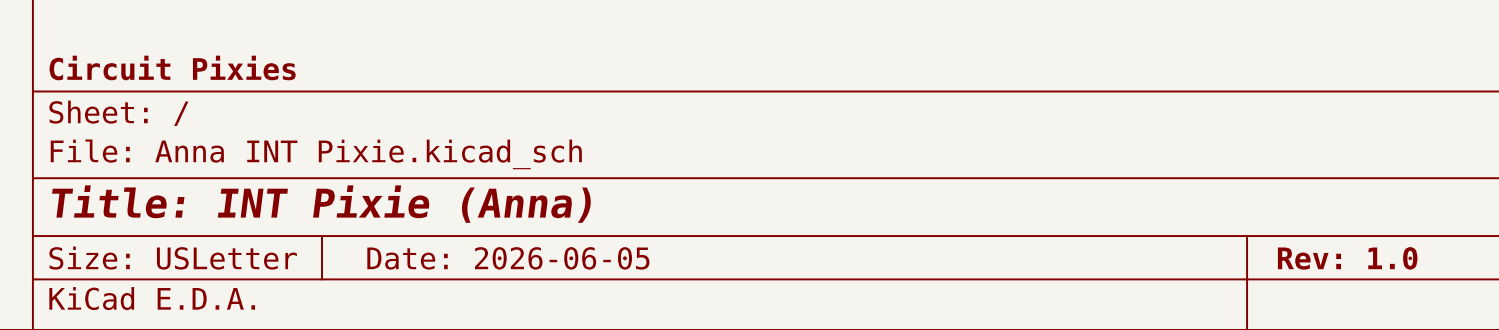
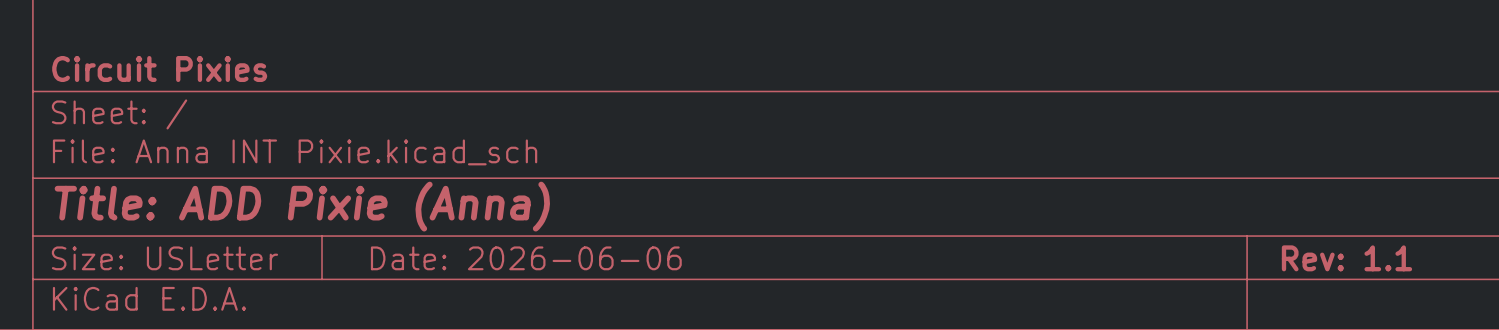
title block: Title: INT Pixie (Anna) (321, 204) -> Title: ADD Pixie (Anna) (302, 206)
title block: Date: 2026-06-05 (508, 258) -> Date: 2026-06-06 (526, 258)
title block: Rev: 1.0 (1347, 258) -> Rev: 1.1 (1346, 258)

